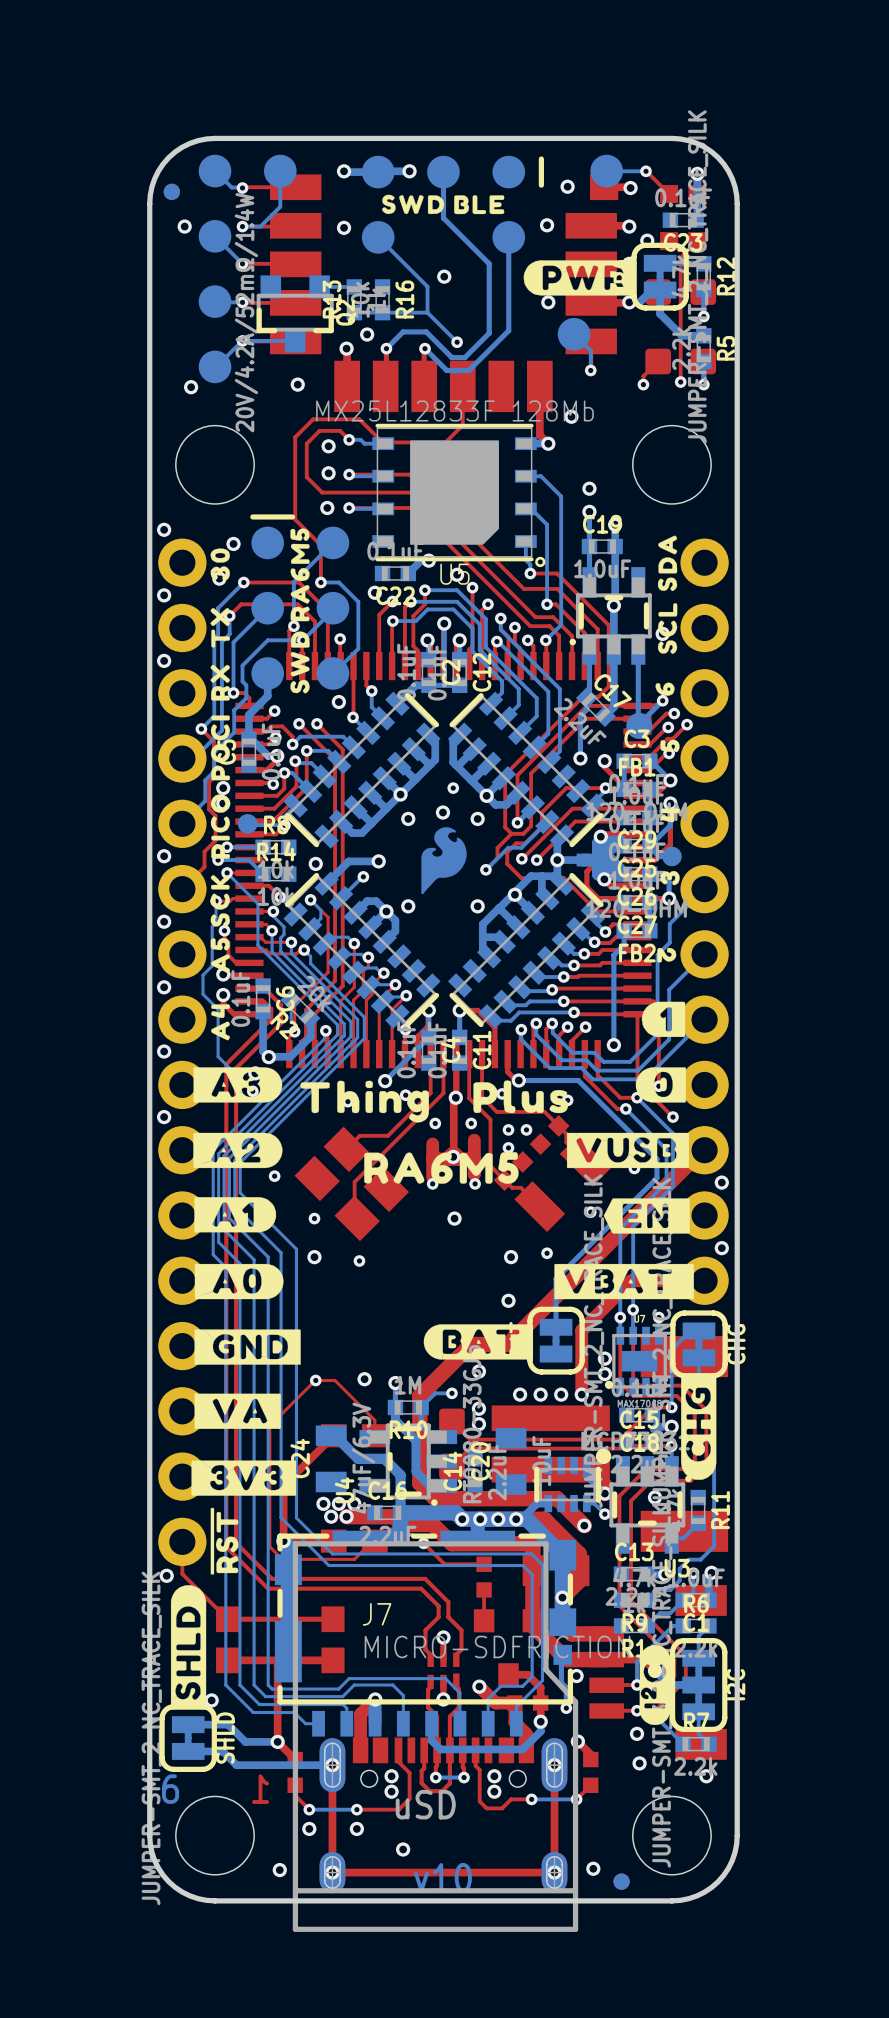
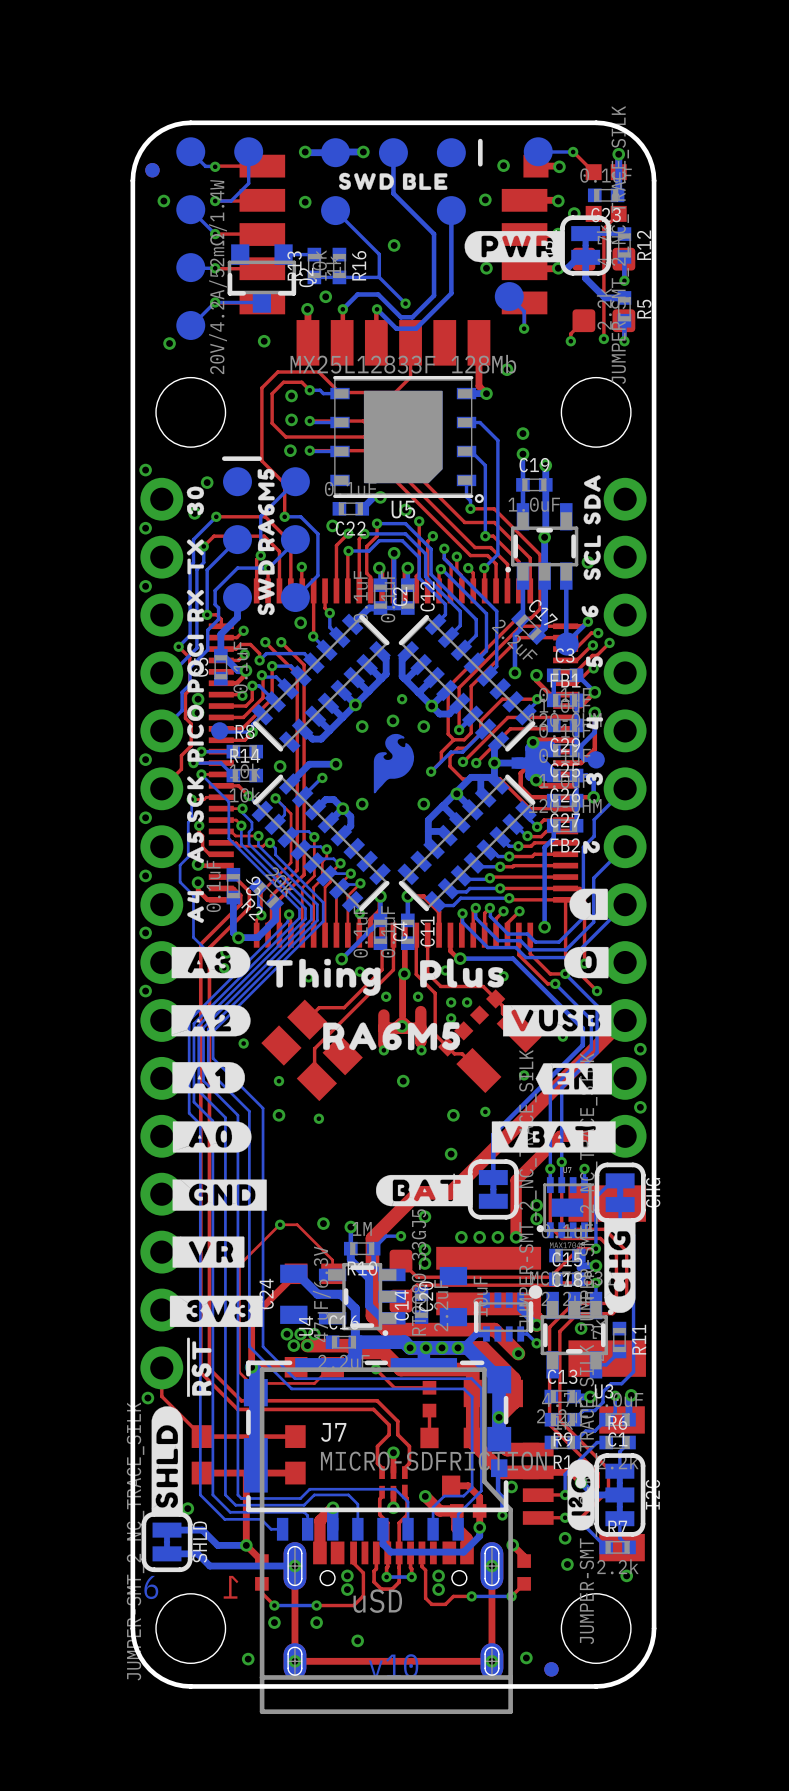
drawing shape: [194, 1393, 281, 1429] -> [172, 1236, 245, 1268]

